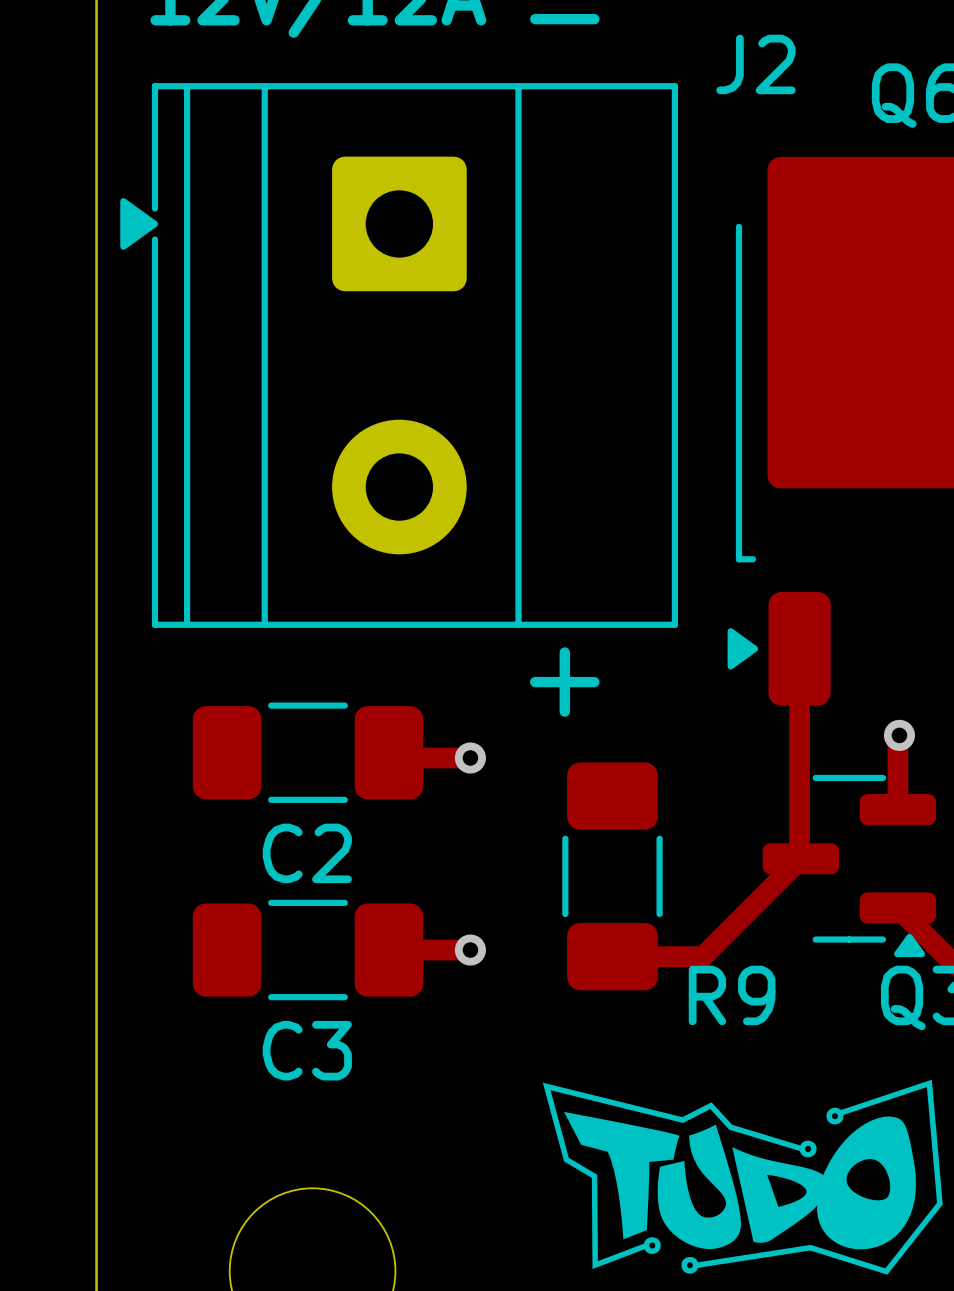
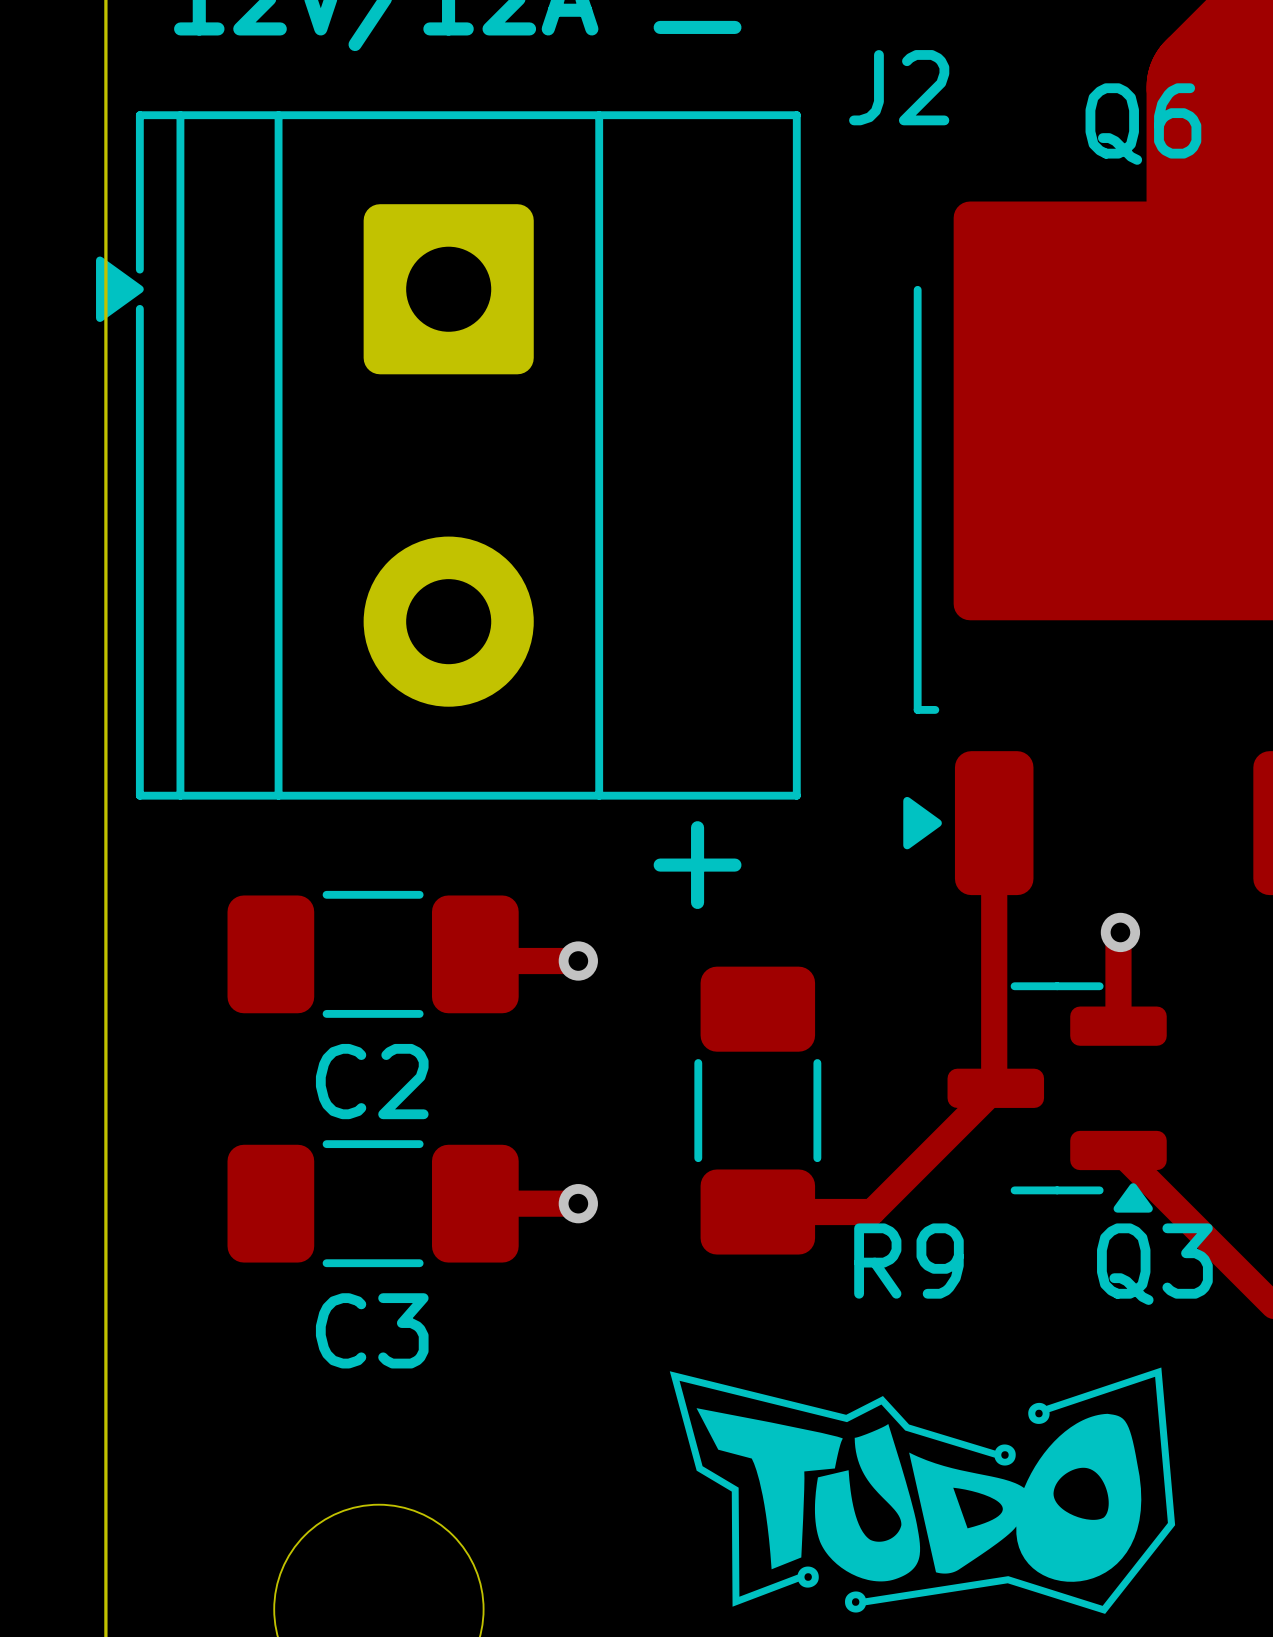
J2 position: (399, 355) -> (448, 455)

